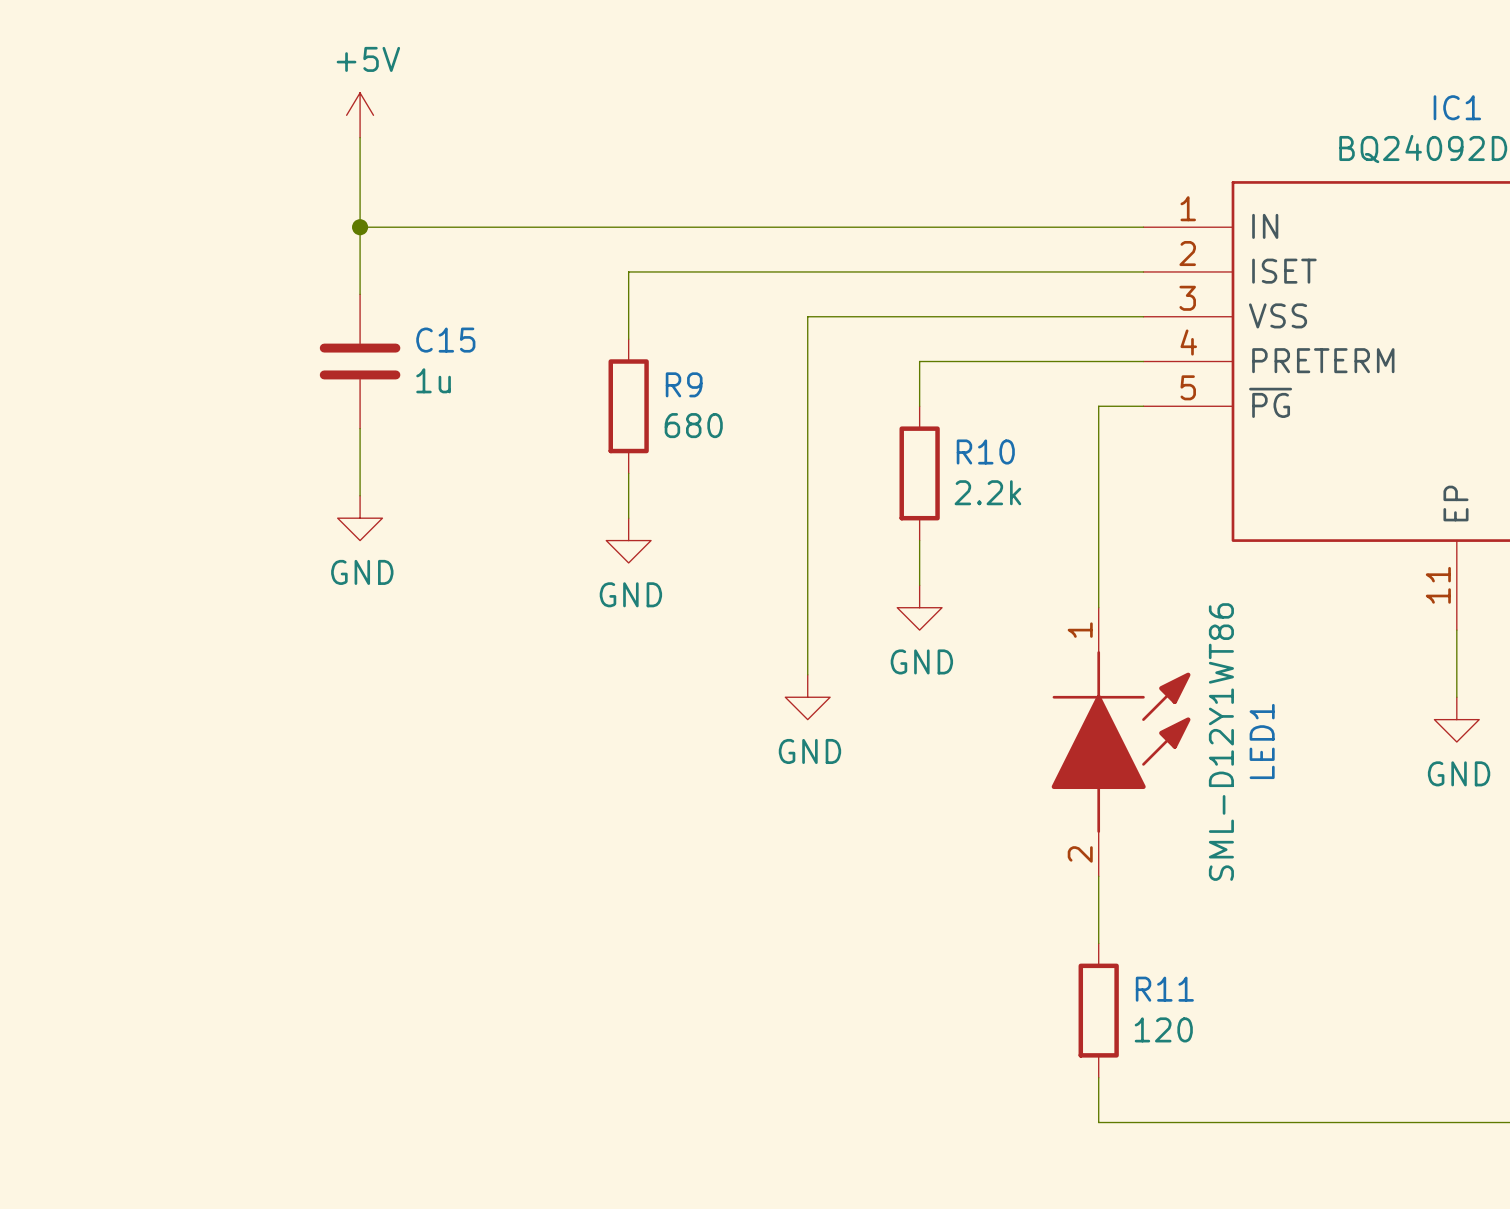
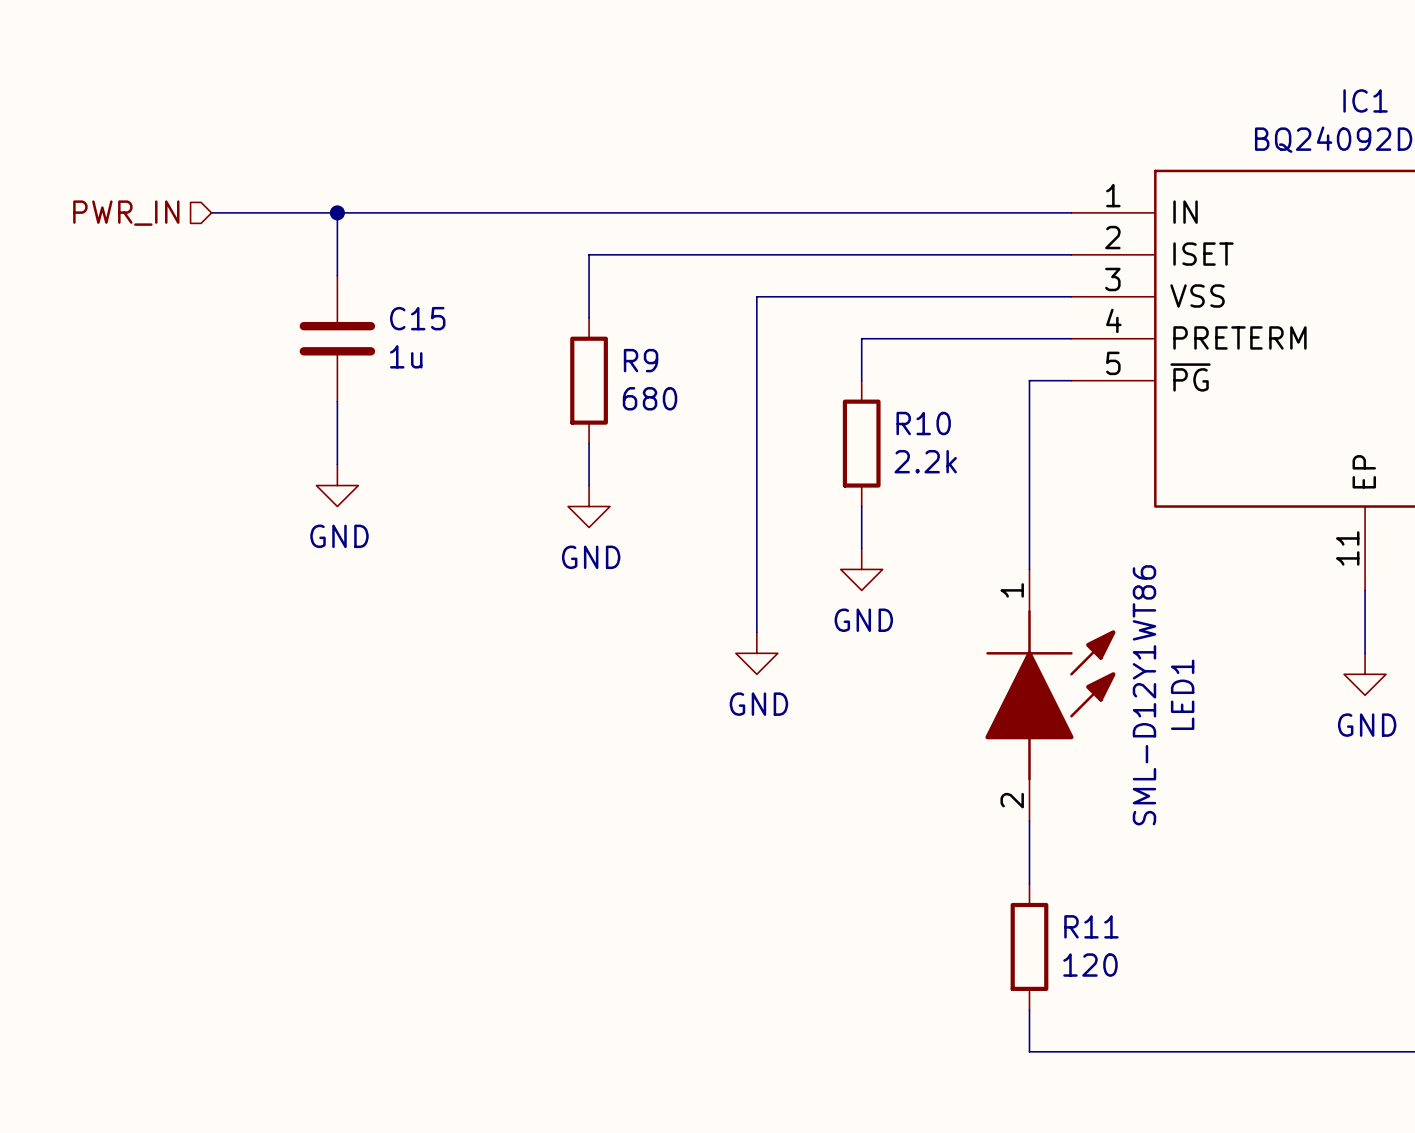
power symbol: +5V (360, 115) -> none
wire: (360, 137) (360, 227) -> (211, 212) (337, 212)
hierarchical label: none -> PWR_IN (126, 213)

